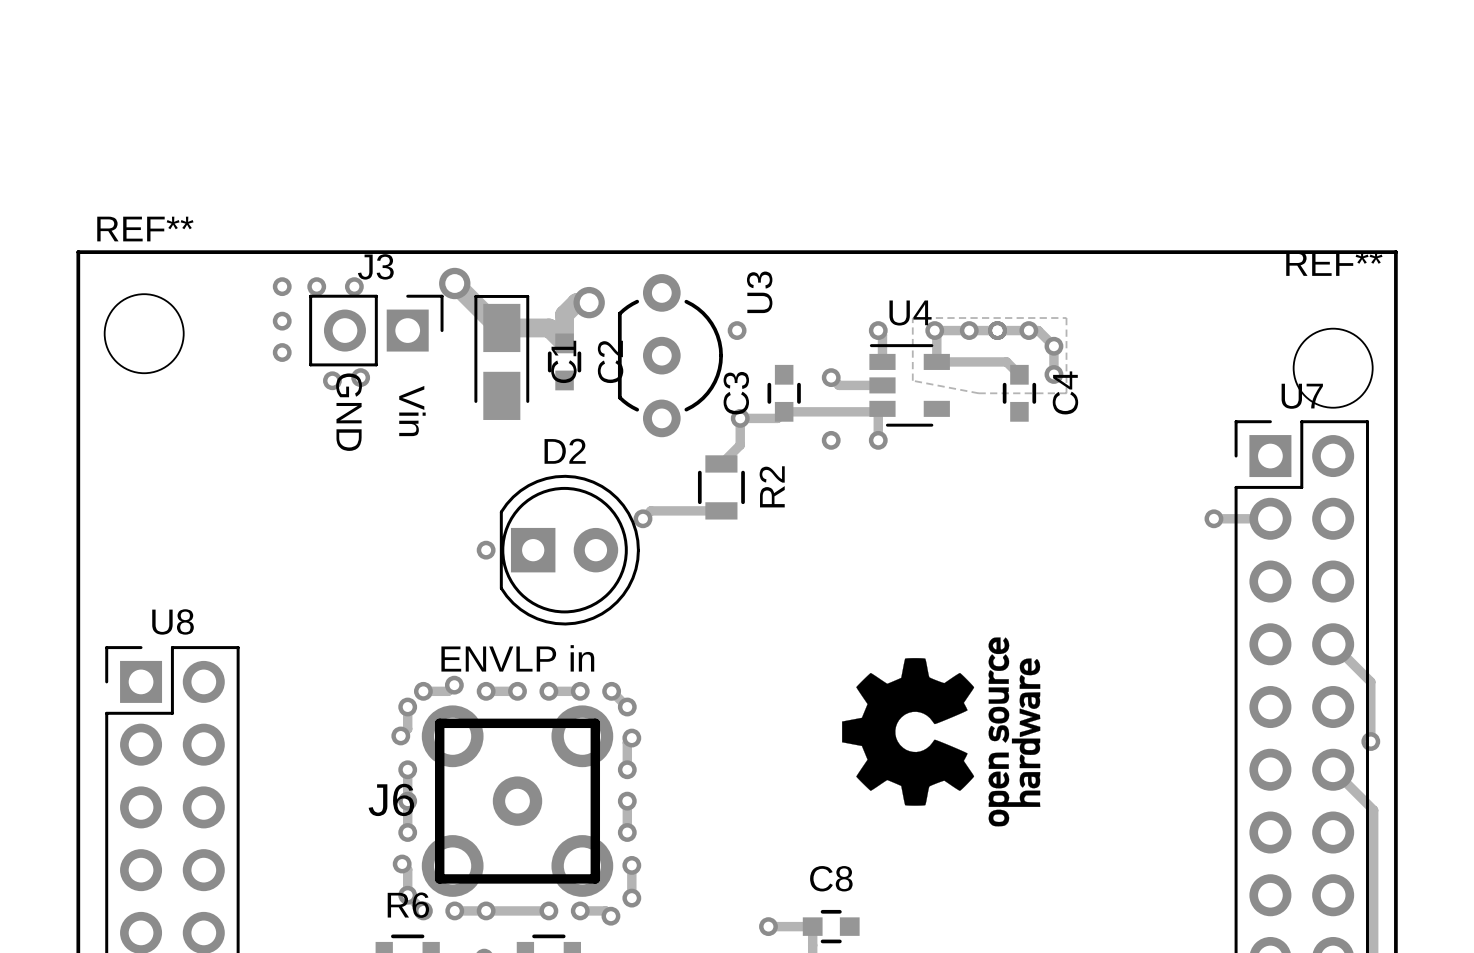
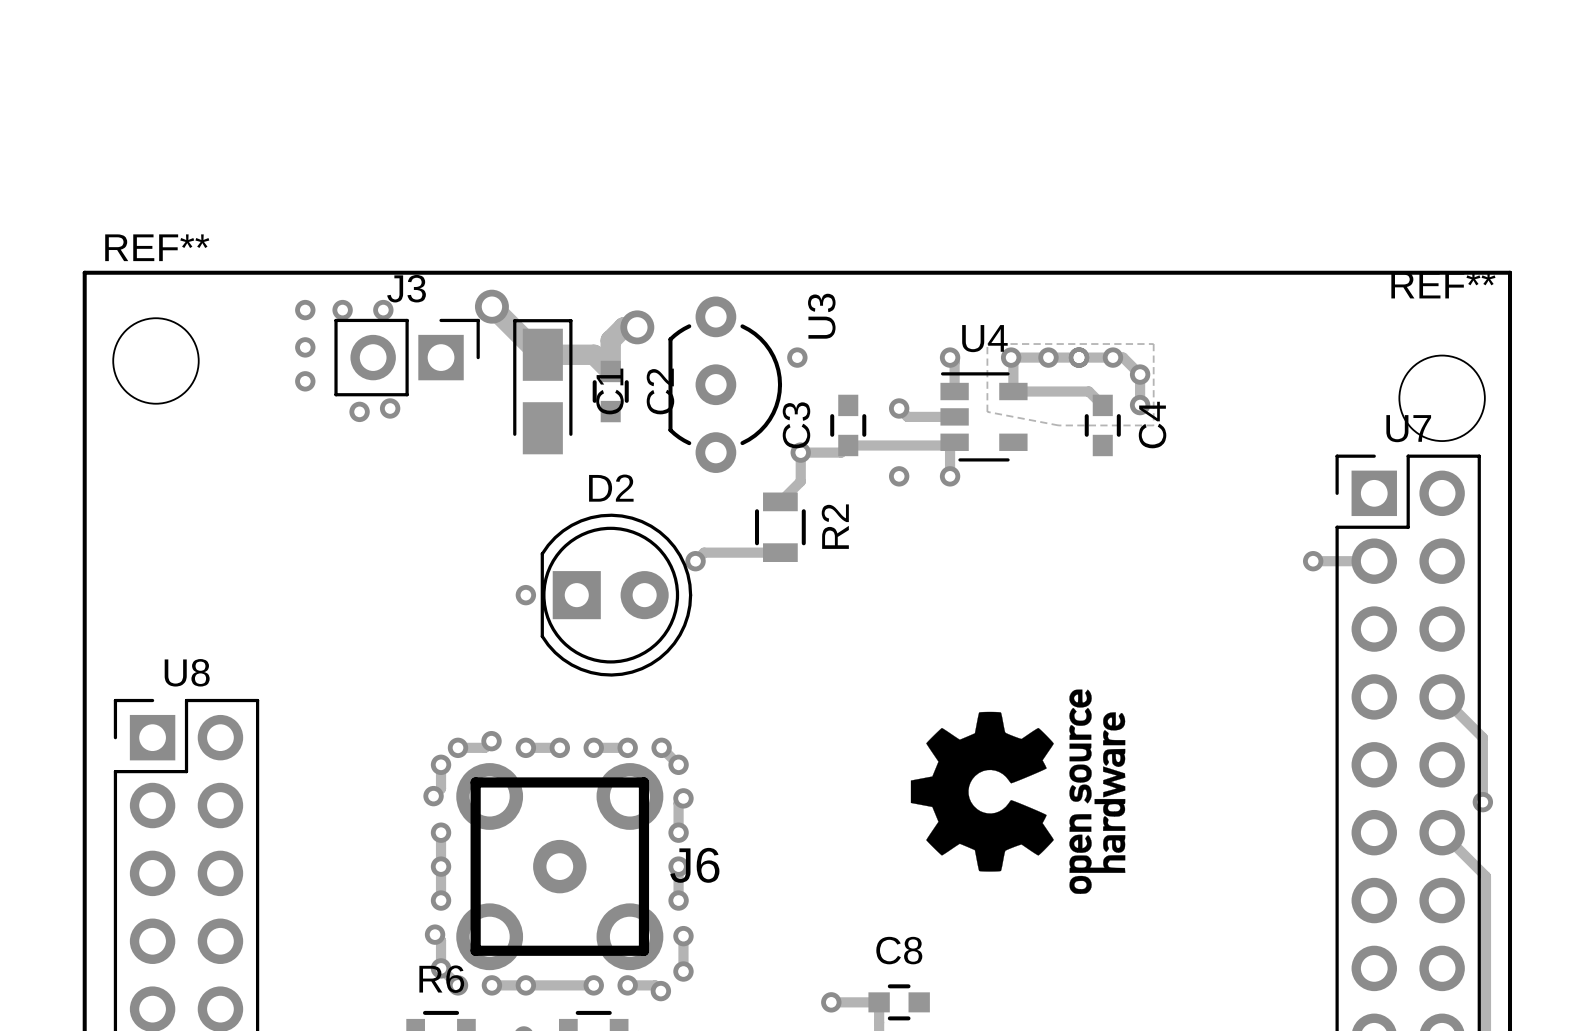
text: Vin (412, 411) -> none
text: GND (349, 412) -> none
text: ENVLP in (517, 658) -> none
J6 name position: J6 (391, 799) -> J6 (694, 865)

